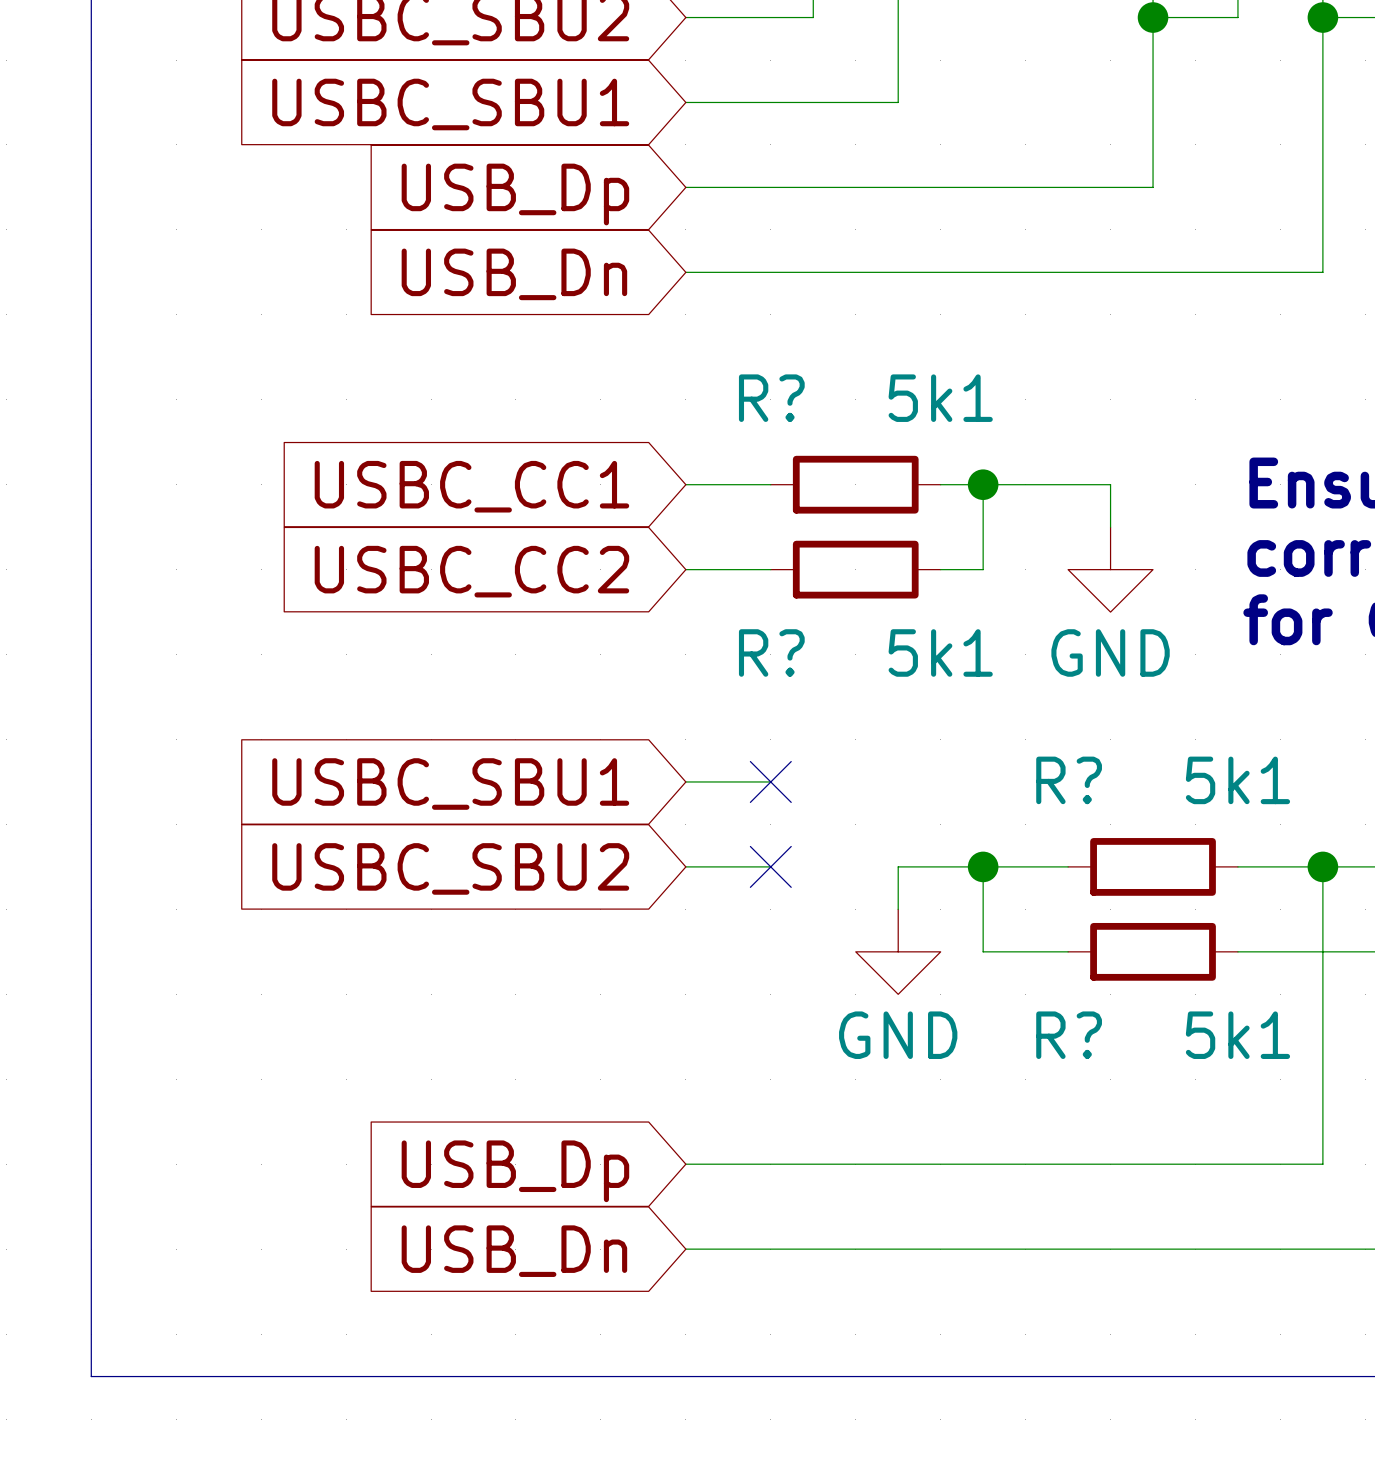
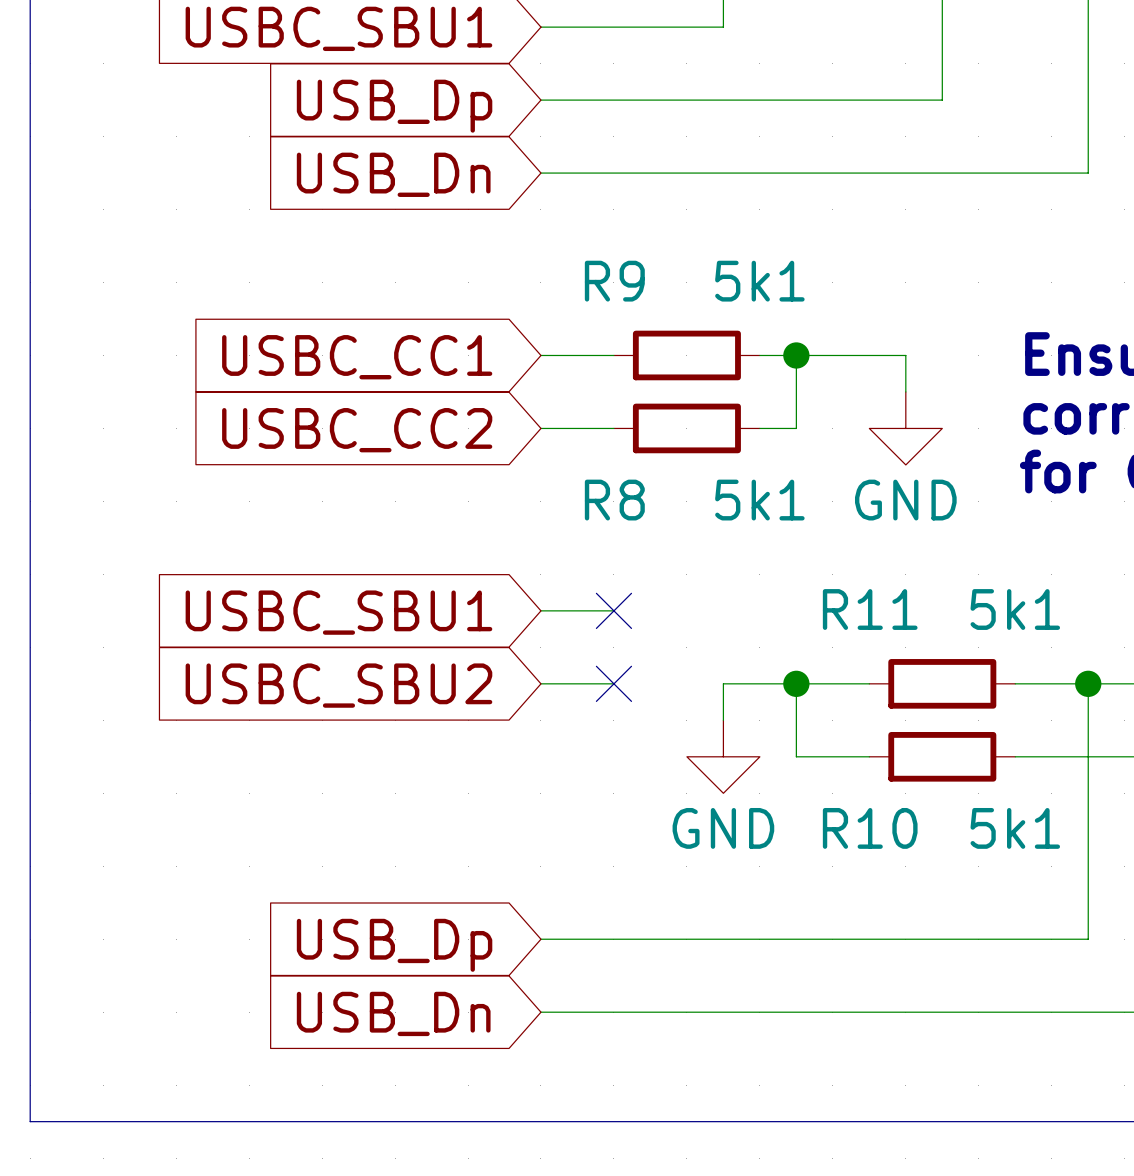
R? name: R? (771, 398) -> R9 (614, 281)
R? name: R? (771, 652) -> R8 (614, 500)
R? name: R? (1069, 780) -> R11 (870, 609)
R? name: R? (1069, 1035) -> R10 (870, 828)

